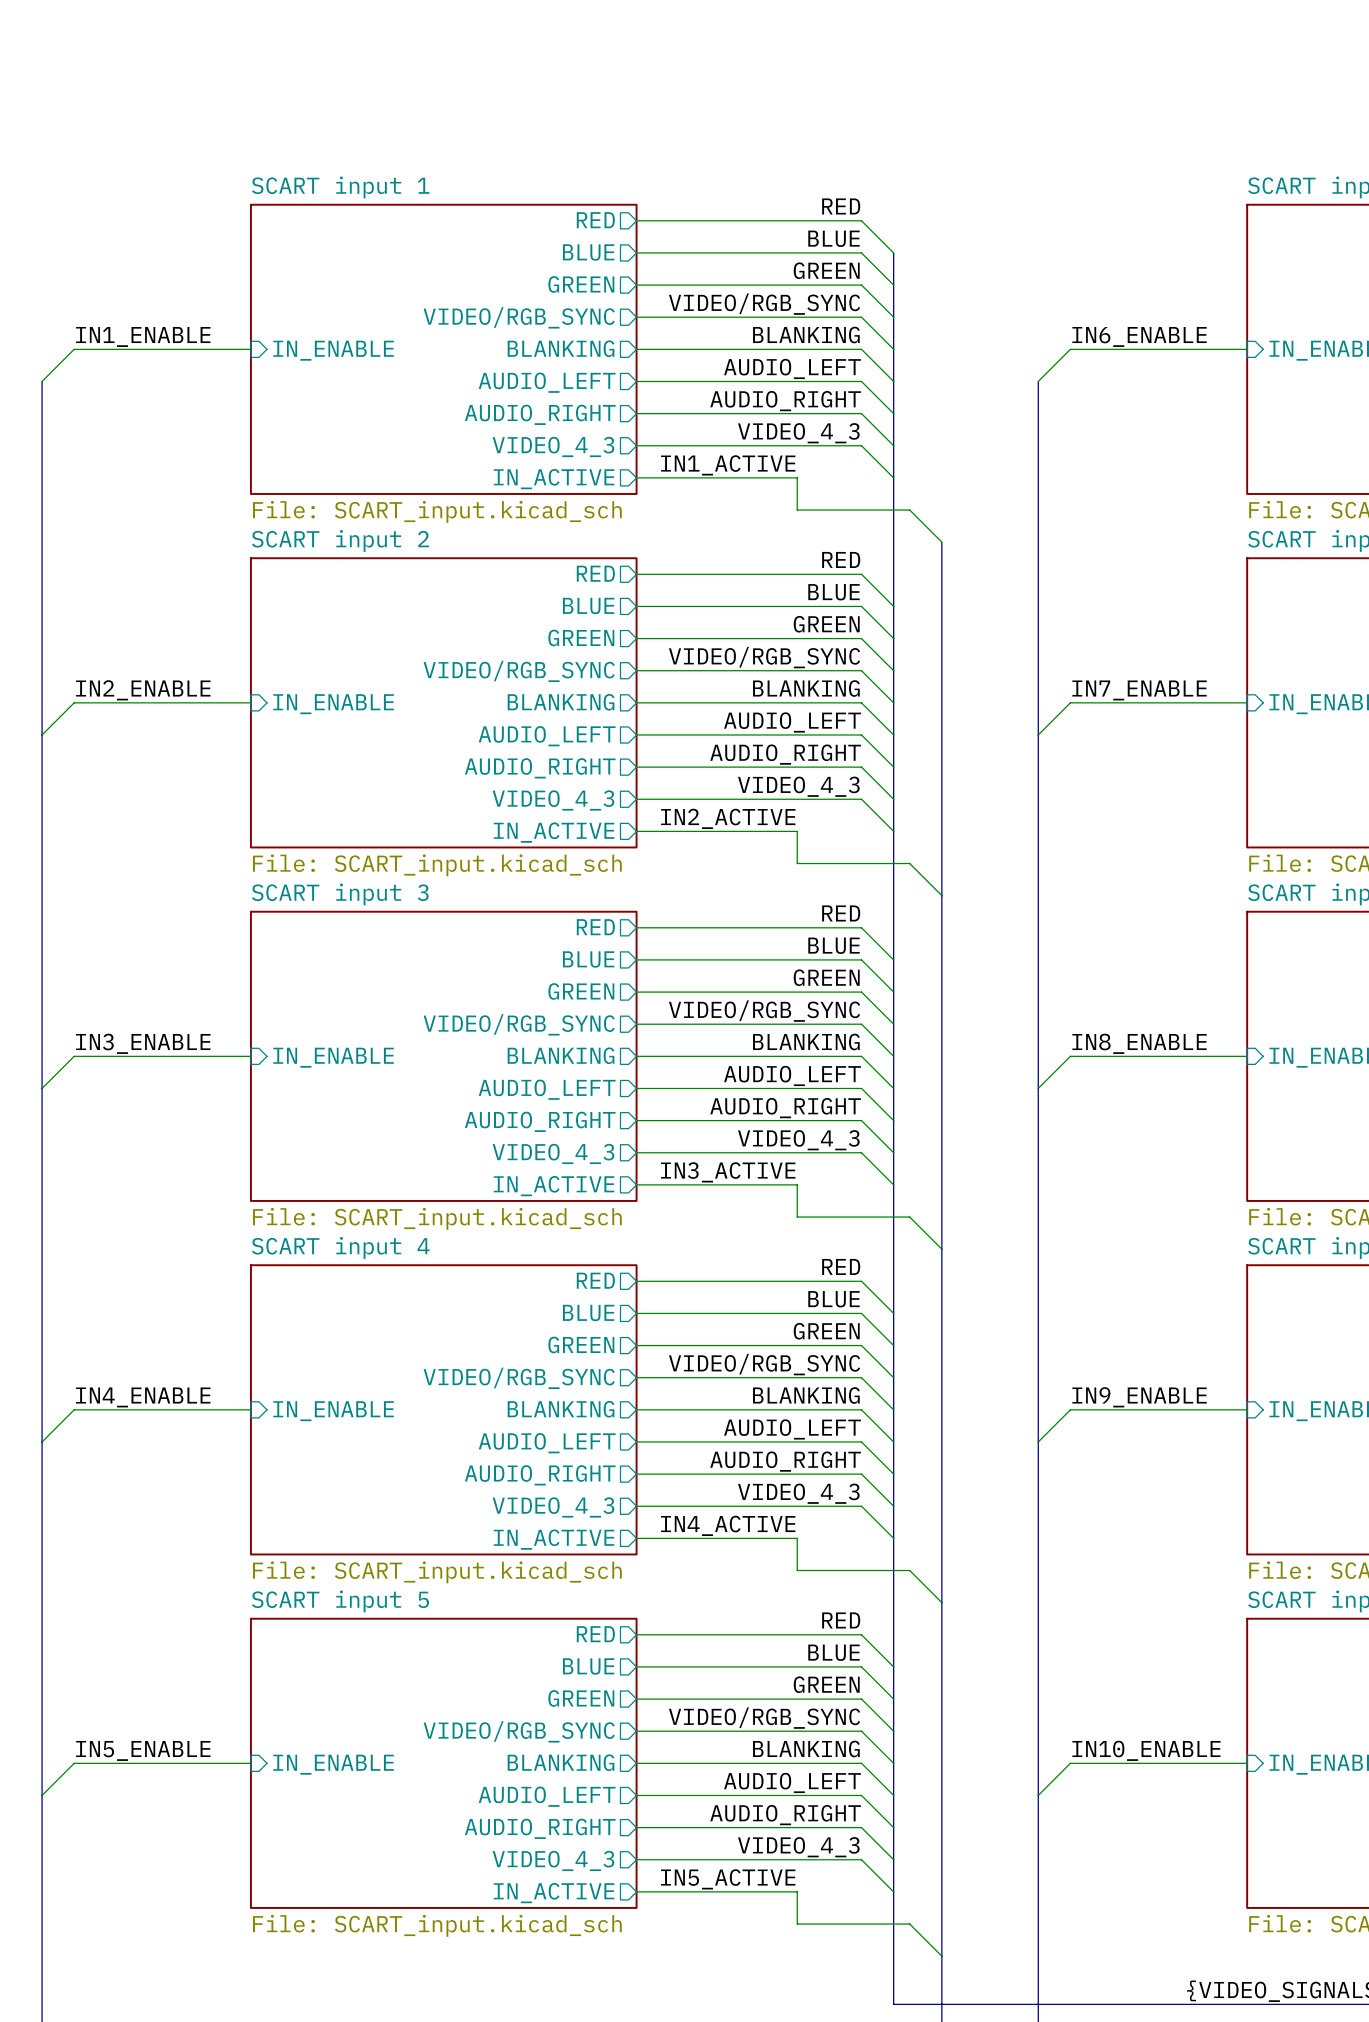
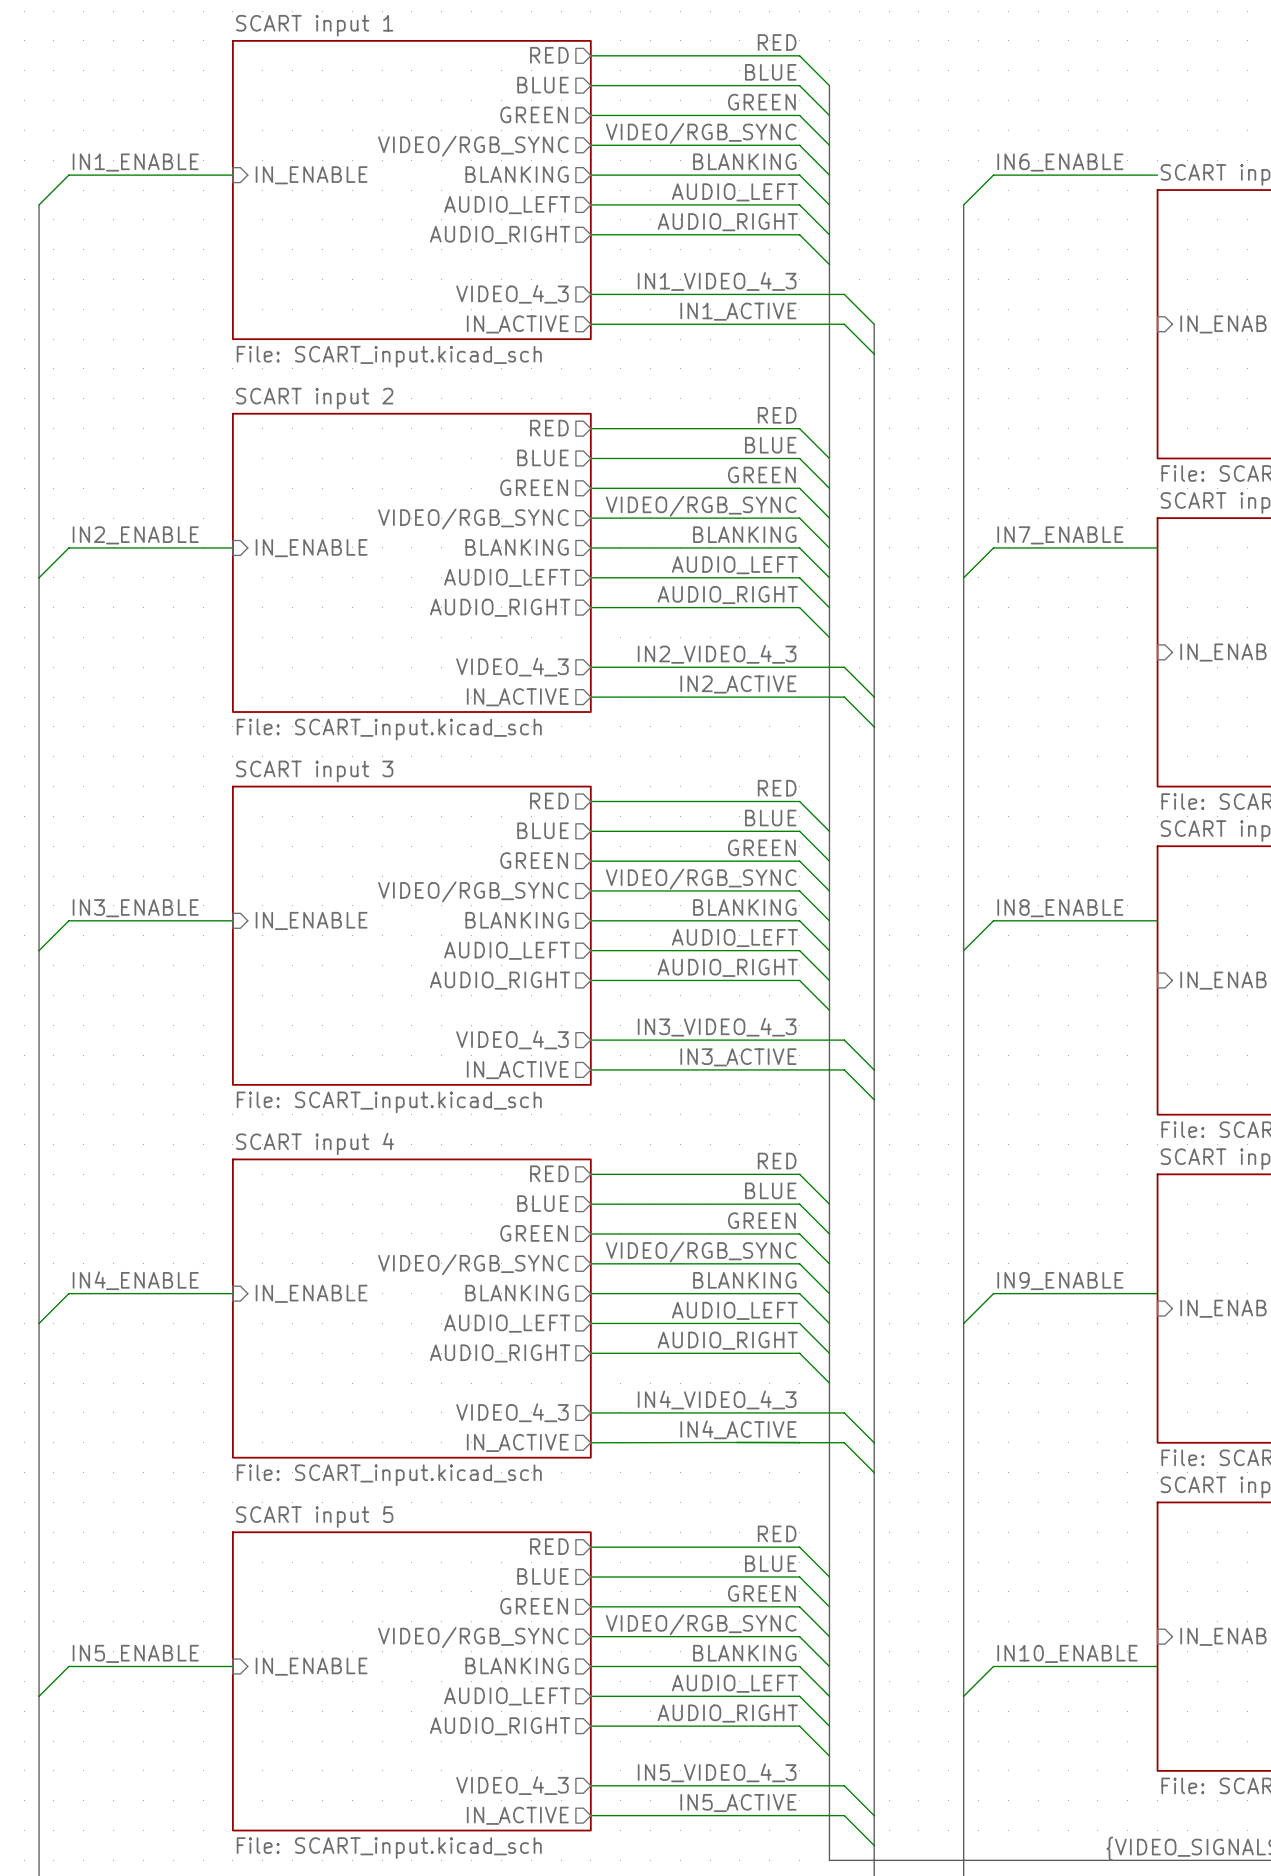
label: none -> RED (777, 42)
sheet pin: none -> RED (549, 55)
wire: none -> (590, 55) (799, 55) (829, 85)
label: none -> BLUE (770, 72)
sheet pin: none -> BLUE (543, 85)
bus: none -> (829, 85) (829, 234)
label: none -> GREEN (761, 102)
sheet pin: none -> GREEN (534, 114)
label: none -> VIDEO/RGB_SYNC (701, 133)
sheet pin: none -> VIDEO/RGB_SYNC (473, 146)
label: none -> BLANKING (744, 161)
sheet pin: none -> BLANKING (517, 174)
sheet pin: none -> IN_ENABLE (311, 175)
sheet SCART input 1 shape: [249, 203, 638, 495] -> [232, 40, 592, 341]
label: RED (841, 206) -> AUDIO_LEFT (734, 192)
bus: none -> (39, 204) (39, 354)
sheet pin: RED (595, 220) -> AUDIO_LEFT (507, 205)
bus: none -> (963, 204) (963, 354)
label: BLUE (833, 238) -> AUDIO_RIGHT (727, 222)
sheet pin: BLUE (588, 252) -> AUDIO_RIGHT (500, 234)
label: GREEN (826, 270) -> none
sheet pin: GREEN (581, 284) -> none
wire: (636, 285) (861, 285) (893, 317) -> (590, 85) (799, 85) (829, 115)
label: VIDEO/RGB_SYNC (764, 304) -> IN1_VIDEO_4_3 (717, 281)
sheet pin: VIDEO/RGB_SYNC (519, 317) -> VIDEO_4_3 (512, 294)
wire: (861, 317) (893, 349) -> (799, 294) (844, 294) (874, 324)
label: BLANKING (806, 335) -> IN1_ACTIVE (738, 311)
label position: IN1_ENABLE (143, 336) -> IN1_ENABLE (135, 162)
label position: IN6_ENABLE (1139, 336) -> IN6_ENABLE (1060, 162)
sheet pin: BLANKING (561, 348) -> IN_ACTIVE (517, 324)
wire: (250, 349) (74, 349) (42, 381) -> (232, 175) (68, 175) (39, 204)
wire: (861, 349) (893, 381) -> (799, 324) (844, 324) (874, 354)
bus: none -> (874, 324) (874, 503)
wire: (1247, 349) (1070, 349) (1038, 381) -> (1157, 175) (993, 175) (963, 204)
sheet pin: IN_ENABLE (333, 350) -> none
label: AUDIO_LEFT (792, 368) -> none
wire: (636, 381) (861, 381) (893, 413) -> (590, 115) (799, 115) (829, 145)
sheet pin: AUDIO_LEFT (547, 382) -> none
label: AUDIO_RIGHT (785, 401) -> none
wire: (636, 413) (861, 413) (893, 445) -> (590, 145) (799, 145) (829, 175)
sheet pin: AUDIO_RIGHT (540, 414) -> none
label: VIDEO_4_3 (798, 433) -> none
wire: (636, 445) (861, 445) (893, 477) -> (590, 175) (799, 175) (829, 204)
sheet pin: VIDEO_4_3 (553, 446) -> none
label: IN1_ACTIVE (728, 465) -> none
wire: (636, 477) (797, 477) (797, 510) (909, 510) (941, 542) -> none
sheet pin: IN_ACTIVE (554, 479) -> none
sheet SCART input 2 shape: [249, 557, 638, 849] -> [232, 412, 592, 713]
label position: RED (841, 559) -> RED (777, 415)
sheet pin position: RED (595, 573) -> RED (549, 428)
wire: (636, 574) (861, 574) (893, 606) -> (590, 428) (799, 428) (829, 458)
label position: BLUE (833, 592) -> BLUE (770, 445)
sheet pin position: BLUE (588, 605) -> BLUE (543, 457)
wire: (636, 606) (861, 606) (893, 638) -> (590, 458) (799, 458) (829, 488)
label position: GREEN (826, 624) -> GREEN (761, 475)
sheet pin position: GREEN (581, 637) -> GREEN (534, 487)
wire: (636, 638) (861, 638) (893, 670) -> (590, 488) (799, 488) (829, 518)
label position: VIDEO/RGB_SYNC (764, 657) -> VIDEO/RGB_SYNC (701, 506)
wire: (636, 670) (861, 670) (893, 702) -> (590, 518) (799, 518) (829, 547)
sheet pin position: VIDEO/RGB_SYNC (519, 671) -> VIDEO/RGB_SYNC (473, 518)
label position: BLANKING (806, 688) -> BLANKING (744, 534)
label position: IN2_ENABLE (143, 690) -> IN2_ENABLE (135, 535)
label position: IN7_ENABLE (1139, 690) -> IN7_ENABLE (1060, 535)
wire: (250, 702) (74, 702) (42, 734) -> (232, 547) (68, 547) (39, 577)
sheet pin position: BLANKING (561, 702) -> BLANKING (517, 547)
wire: (636, 702) (861, 702) (893, 734) -> (590, 547) (799, 547) (829, 577)
wire: (1247, 702) (1070, 702) (1038, 734) -> (1157, 547) (993, 547) (963, 577)
sheet pin position: IN_ENABLE (333, 704) -> IN_ENABLE (311, 548)
label: none -> IN2_VIDEO_4_3 (717, 654)
wire: none -> (590, 667) (844, 667) (874, 697)
label position: AUDIO_LEFT (792, 722) -> AUDIO_LEFT (734, 565)
wire: (636, 734) (861, 734) (893, 767) -> (590, 577) (799, 577) (829, 607)
sheet pin position: AUDIO_LEFT (547, 736) -> AUDIO_LEFT (507, 577)
wire: none -> (590, 697) (844, 697) (874, 726)
label position: AUDIO_RIGHT (785, 754) -> AUDIO_RIGHT (727, 595)
wire: (636, 767) (861, 767) (893, 799) -> (590, 607) (799, 607) (829, 637)
sheet pin position: AUDIO_RIGHT (540, 768) -> AUDIO_RIGHT (500, 607)
label: VIDEO_4_3 (798, 786) -> none
wire: (636, 799) (861, 799) (893, 831) -> none
sheet pin position: VIDEO_4_3 (553, 800) -> VIDEO_4_3 (512, 667)
label position: IN2_ACTIVE (728, 818) -> IN2_ACTIVE (738, 684)
wire: (636, 831) (797, 831) (797, 863) -> (590, 801) (739, 801)
sheet pin position: IN_ACTIVE (554, 832) -> IN_ACTIVE (517, 697)
label: none -> RED (777, 788)
sheet pin: none -> RED (549, 800)
wire: (861, 863) (909, 863) (941, 895) -> (799, 801) (829, 831)
label: none -> BLUE (770, 818)
sheet pin: none -> BLUE (543, 830)
sheet SCART input 3 shape: [249, 910, 638, 1202] -> [232, 785, 592, 1086]
label: RED (841, 913) -> GREEN (761, 847)
sheet pin: RED (595, 927) -> GREEN (534, 860)
label: BLUE (833, 945) -> VIDEO/RGB_SYNC (701, 879)
sheet pin: BLUE (588, 959) -> VIDEO/RGB_SYNC (473, 891)
label: GREEN (826, 977) -> BLANKING (744, 907)
sheet pin: GREEN (581, 991) -> BLANKING (517, 920)
label: VIDEO/RGB_SYNC (764, 1011) -> AUDIO_LEFT (734, 938)
sheet pin: VIDEO/RGB_SYNC (519, 1024) -> AUDIO_LEFT (507, 950)
label: BLANKING (806, 1042) -> AUDIO_RIGHT (727, 967)
label position: IN3_ENABLE (143, 1043) -> IN3_ENABLE (135, 908)
label position: IN8_ENABLE (1139, 1043) -> IN8_ENABLE (1060, 908)
sheet pin: BLANKING (561, 1055) -> AUDIO_RIGHT (500, 980)
wire: (250, 1056) (74, 1056) (42, 1088) -> (232, 920) (68, 920) (39, 950)
wire: (1247, 1056) (1070, 1056) (1038, 1088) -> (1157, 920) (993, 920) (963, 950)
sheet pin position: IN_ENABLE (333, 1057) -> IN_ENABLE (311, 920)
label: AUDIO_LEFT (792, 1075) -> none
wire: (636, 1088) (861, 1088) (893, 1120) -> (590, 831) (799, 831) (829, 861)
sheet pin: AUDIO_LEFT (547, 1089) -> none
label: AUDIO_RIGHT (785, 1108) -> IN3_VIDEO_4_3 (717, 1027)
wire: (861, 1120) (893, 1152) -> (799, 1040) (844, 1040) (874, 1069)
sheet pin: AUDIO_RIGHT (540, 1121) -> VIDEO_4_3 (512, 1039)
label: VIDEO_4_3 (798, 1140) -> IN3_ACTIVE (738, 1057)
wire: (861, 1152) (893, 1184) -> (799, 1069) (844, 1069) (874, 1099)
sheet pin: VIDEO_4_3 (553, 1153) -> IN_ACTIVE (517, 1070)
label: IN3_ACTIVE (728, 1172) -> none
wire: (636, 1184) (797, 1184) (797, 1217) (909, 1217) (941, 1249) -> none
sheet pin: IN_ACTIVE (554, 1186) -> none
sheet SCART input 4 shape: [249, 1264, 638, 1556] -> [232, 1158, 592, 1459]
label position: RED (841, 1266) -> RED (777, 1161)
sheet pin position: RED (595, 1280) -> RED (549, 1173)
wire: (636, 1281) (861, 1281) (893, 1313) -> none
label position: BLUE (833, 1299) -> BLUE (770, 1190)
sheet pin position: BLUE (588, 1312) -> BLUE (543, 1203)
wire: (636, 1313) (861, 1313) (893, 1345) -> none
label position: GREEN (826, 1331) -> GREEN (761, 1220)
sheet pin position: GREEN (581, 1344) -> GREEN (534, 1233)
wire: (636, 1345) (861, 1345) (893, 1377) -> (590, 1323) (799, 1323) (829, 1353)
label position: VIDEO/RGB_SYNC (764, 1364) -> VIDEO/RGB_SYNC (701, 1251)
wire: (636, 1377) (861, 1377) (893, 1409) -> (590, 1174) (799, 1174) (829, 1204)
sheet pin position: VIDEO/RGB_SYNC (519, 1378) -> VIDEO/RGB_SYNC (473, 1264)
label position: BLANKING (806, 1395) -> BLANKING (744, 1280)
label position: IN4_ENABLE (143, 1397) -> IN4_ENABLE (135, 1280)
label position: IN9_ENABLE (1139, 1397) -> IN9_ENABLE (1060, 1281)
wire: (250, 1409) (74, 1409) (42, 1441) -> (232, 1293) (68, 1293) (39, 1323)
sheet pin position: BLANKING (561, 1409) -> BLANKING (517, 1293)
wire: (636, 1409) (861, 1409) (893, 1441) -> (590, 1204) (799, 1204) (829, 1233)
wire: (1247, 1409) (1070, 1409) (1038, 1441) -> (1157, 1293) (993, 1293) (963, 1323)
sheet pin position: IN_ENABLE (333, 1411) -> IN_ENABLE (311, 1293)
label position: AUDIO_LEFT (792, 1429) -> AUDIO_LEFT (734, 1310)
wire: (636, 1441) (861, 1441) (893, 1474) -> (590, 1233) (799, 1233) (829, 1263)
sheet pin position: AUDIO_LEFT (547, 1443) -> AUDIO_LEFT (507, 1323)
label position: AUDIO_RIGHT (785, 1461) -> AUDIO_RIGHT (727, 1340)
wire: (636, 1474) (861, 1474) (893, 1506) -> (590, 1263) (799, 1263) (829, 1293)
sheet pin position: AUDIO_RIGHT (540, 1475) -> AUDIO_RIGHT (500, 1353)
label: VIDEO_4_3 (798, 1493) -> IN4_VIDEO_4_3 (717, 1400)
wire: (636, 1506) (861, 1506) (893, 1538) -> (590, 1293) (799, 1293) (829, 1323)
sheet pin position: VIDEO_4_3 (553, 1507) -> VIDEO_4_3 (512, 1412)
wire: none -> (590, 1412) (844, 1412) (874, 1442)
label position: IN4_ACTIVE (728, 1525) -> IN4_ACTIVE (738, 1429)
wire: (636, 1538) (797, 1538) (797, 1570) (909, 1570) (941, 1602) -> none
sheet pin position: IN_ACTIVE (554, 1539) -> IN_ACTIVE (517, 1442)
wire: none -> (737, 1442) (844, 1442) (874, 1472)
wire: none -> (737, 1442) (590, 1442)
sheet SCART input 5 shape: [249, 1617, 638, 1909] -> [232, 1531, 592, 1832]
label: RED (841, 1620) -> none
sheet pin: RED (595, 1634) -> none
wire: (636, 1634) (861, 1634) (893, 1666) -> (590, 1353) (799, 1353) (829, 1383)
label: BLUE (833, 1652) -> RED (777, 1533)
sheet pin: BLUE (588, 1666) -> RED (549, 1546)
label: GREEN (826, 1684) -> BLUE (770, 1563)
sheet pin: GREEN (581, 1698) -> BLUE (543, 1576)
label: VIDEO/RGB_SYNC (764, 1718) -> GREEN (761, 1593)
sheet pin: VIDEO/RGB_SYNC (519, 1731) -> GREEN (534, 1606)
label: BLANKING (806, 1749) -> VIDEO/RGB_SYNC (701, 1624)
label position: IN5_ENABLE (143, 1750) -> IN5_ENABLE (135, 1653)
label position: IN10_ENABLE (1146, 1750) -> IN10_ENABLE (1067, 1653)
sheet pin: BLANKING (561, 1762) -> VIDEO/RGB_SYNC (473, 1637)
wire: (250, 1763) (74, 1763) (42, 1795) -> (232, 1666) (68, 1666) (39, 1696)
wire: (1247, 1763) (1070, 1763) (1038, 1795) -> (1157, 1666) (993, 1666) (963, 1696)
sheet pin position: IN_ENABLE (333, 1764) -> IN_ENABLE (311, 1666)
label: AUDIO_LEFT (792, 1782) -> BLANKING (744, 1653)
sheet pin: AUDIO_LEFT (547, 1796) -> BLANKING (517, 1665)
label: AUDIO_RIGHT (785, 1815) -> AUDIO_LEFT (734, 1683)
sheet pin: AUDIO_RIGHT (540, 1828) -> AUDIO_LEFT (507, 1696)
label: VIDEO_4_3 (798, 1847) -> AUDIO_RIGHT (727, 1713)
sheet pin: VIDEO_4_3 (553, 1860) -> AUDIO_RIGHT (500, 1726)
label position: IN5_ACTIVE (728, 1879) -> IN5_ACTIVE (738, 1803)
wire: (636, 1891) (797, 1891) (797, 1924) -> (590, 1785) (739, 1785)
sheet pin position: IN_ACTIVE (554, 1893) -> IN_ACTIVE (517, 1815)
label: none -> IN5_VIDEO_4_3 (717, 1772)
sheet pin: none -> VIDEO_4_3 (512, 1785)
wire: none -> (590, 1815) (844, 1815) (874, 1845)

